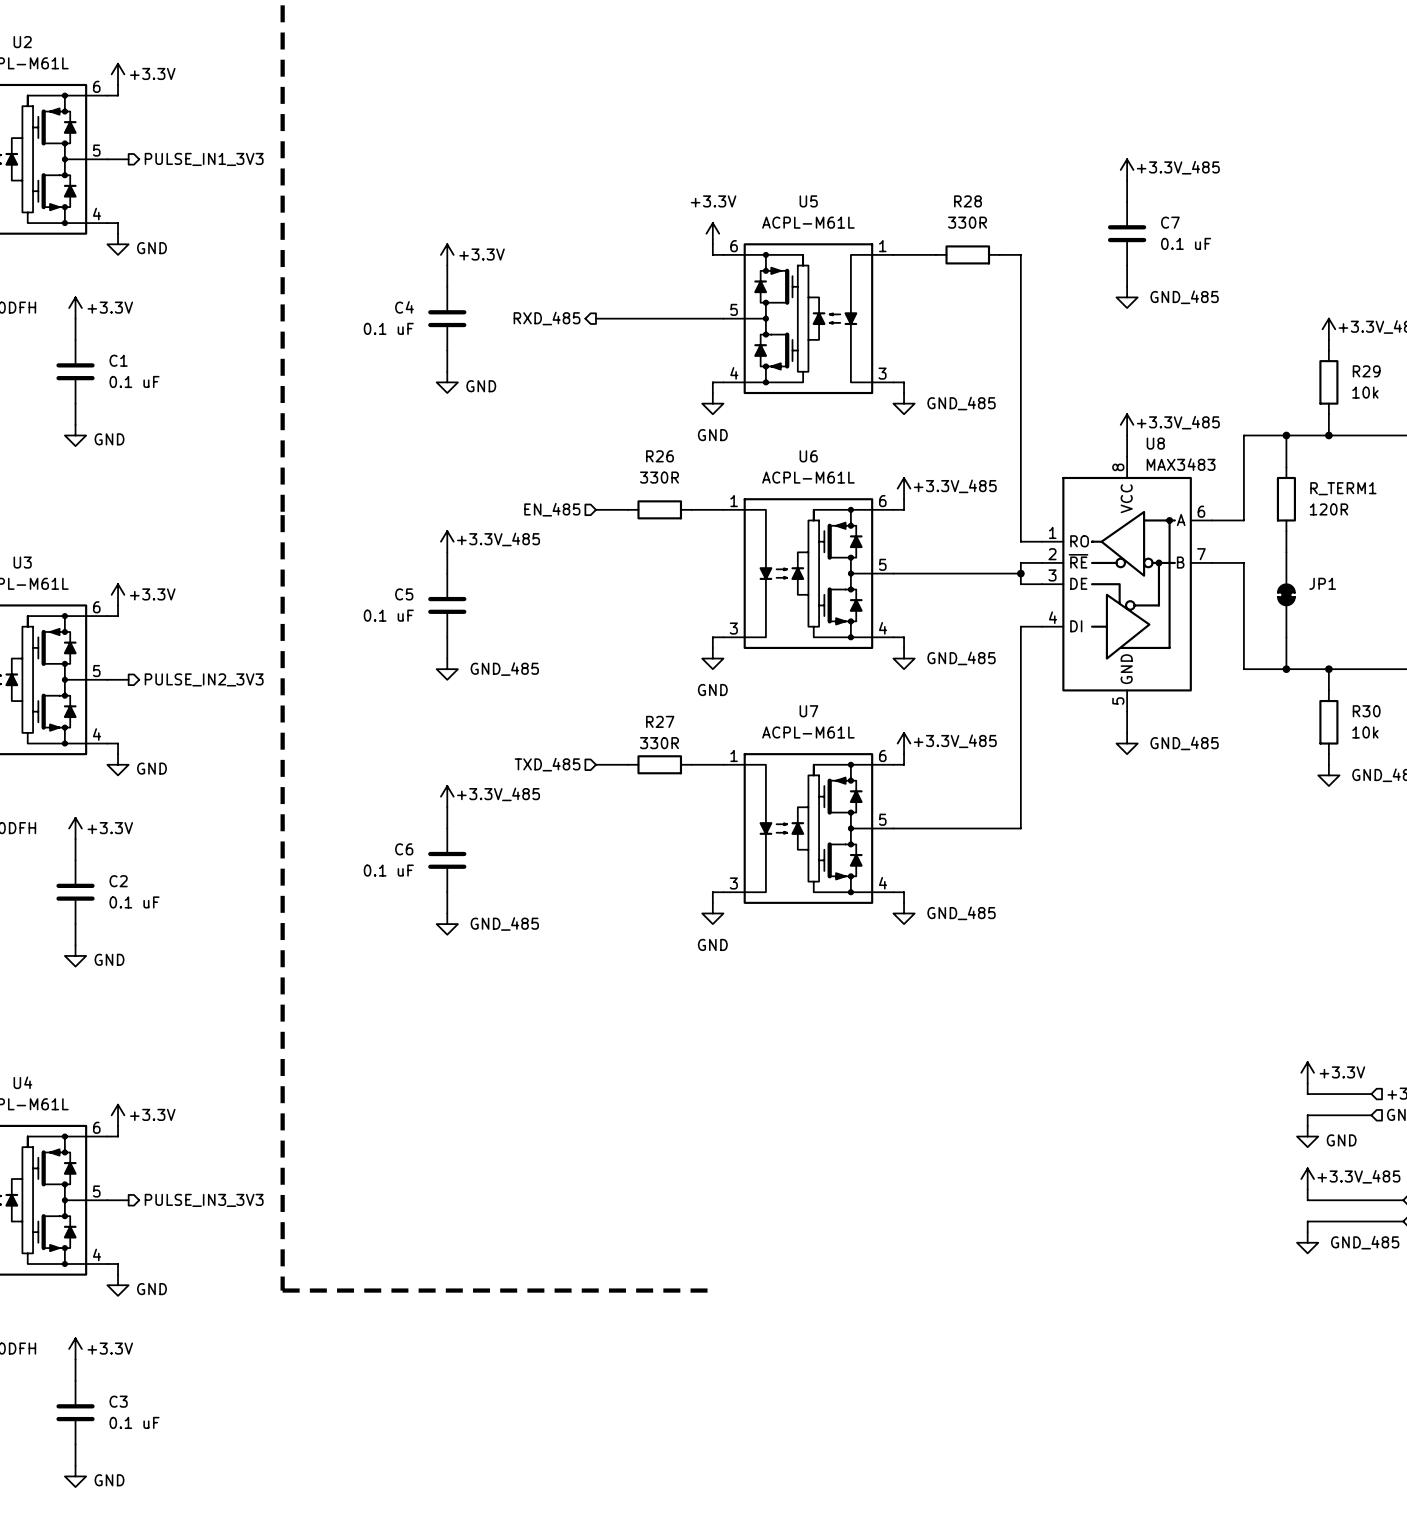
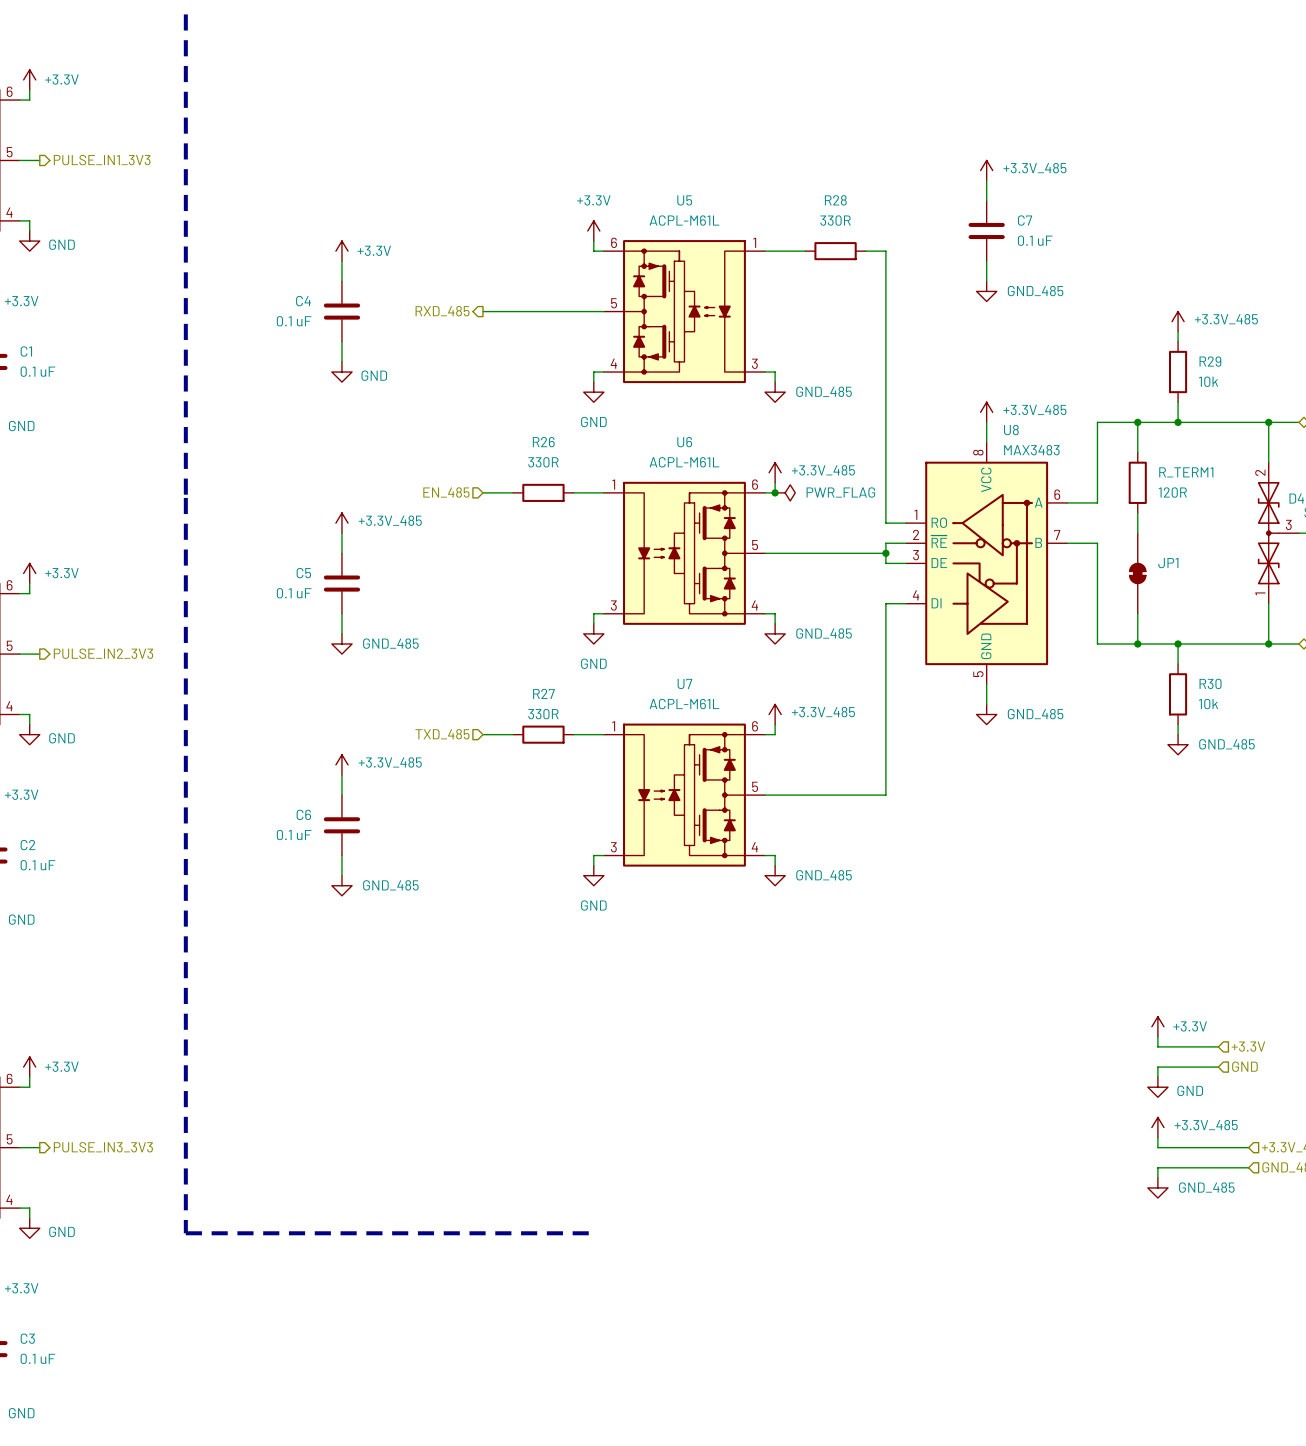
junction: none -> (775, 492)
power symbol: none -> PWR_FLAG (785, 492)

